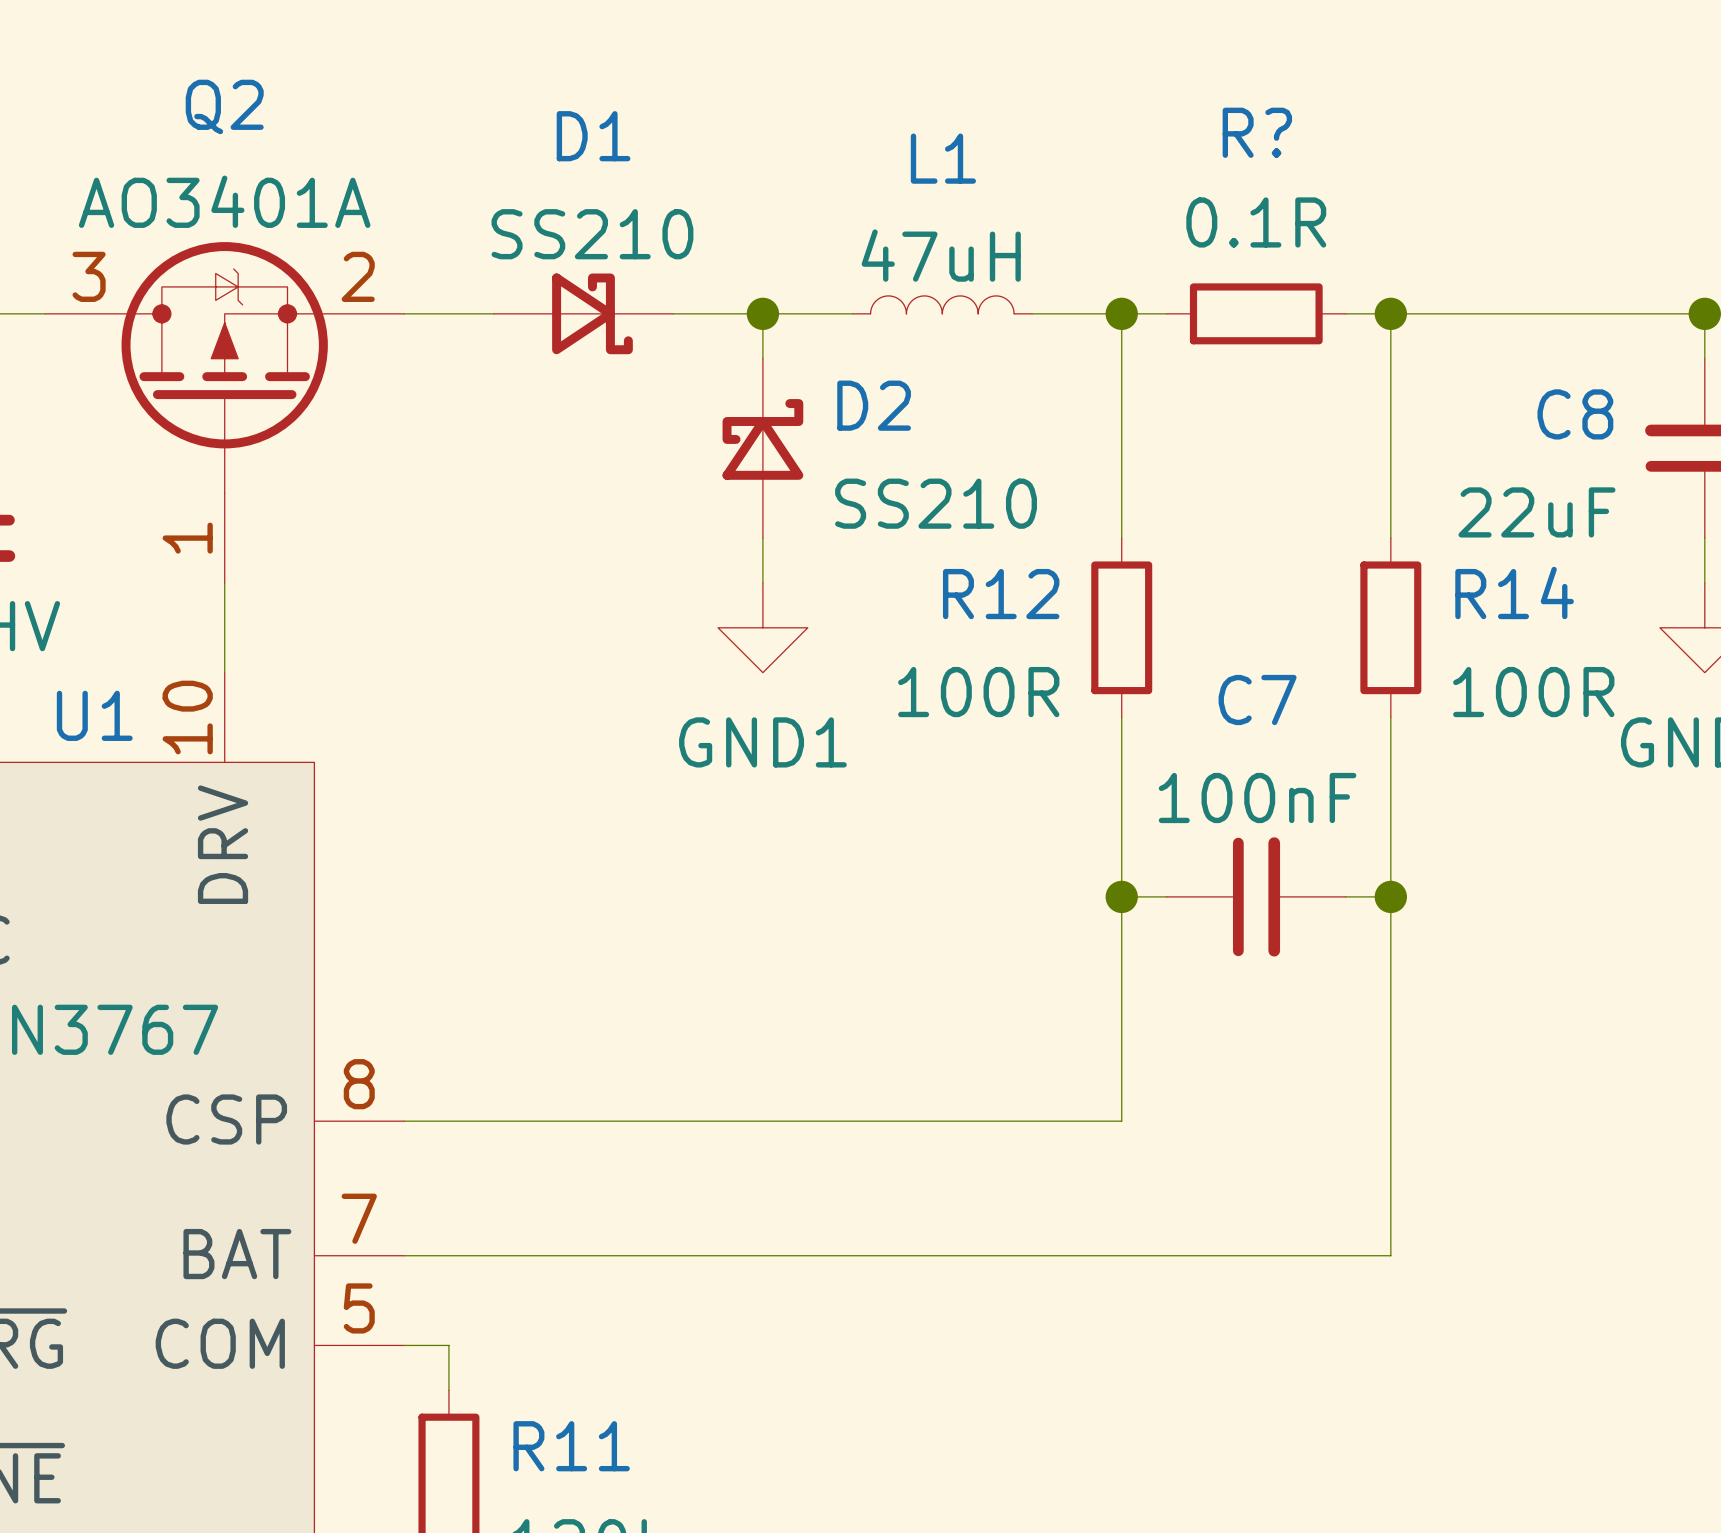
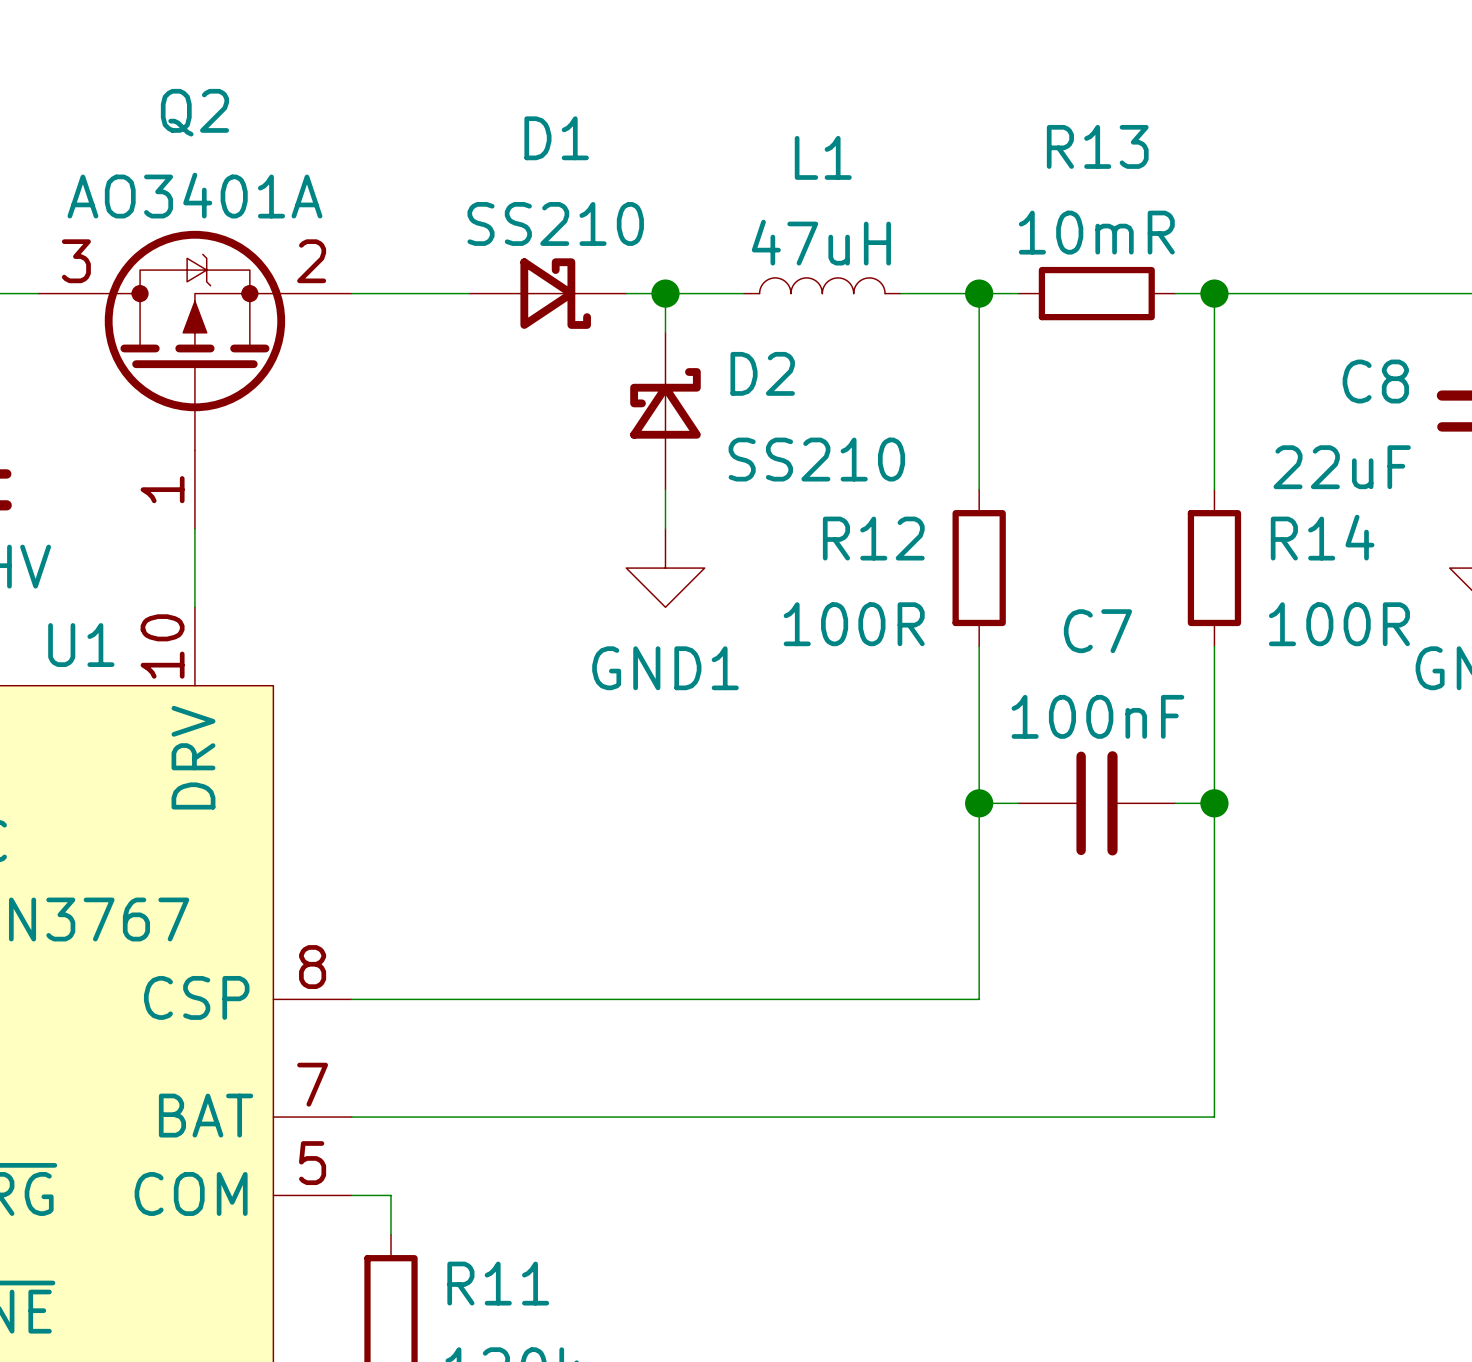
R? name: R? (1257, 132) -> R13 (1097, 146)
R? value: 0.1R (1256, 222) -> 10mR (1096, 232)
D1 position: (583, 313) -> (547, 293)

